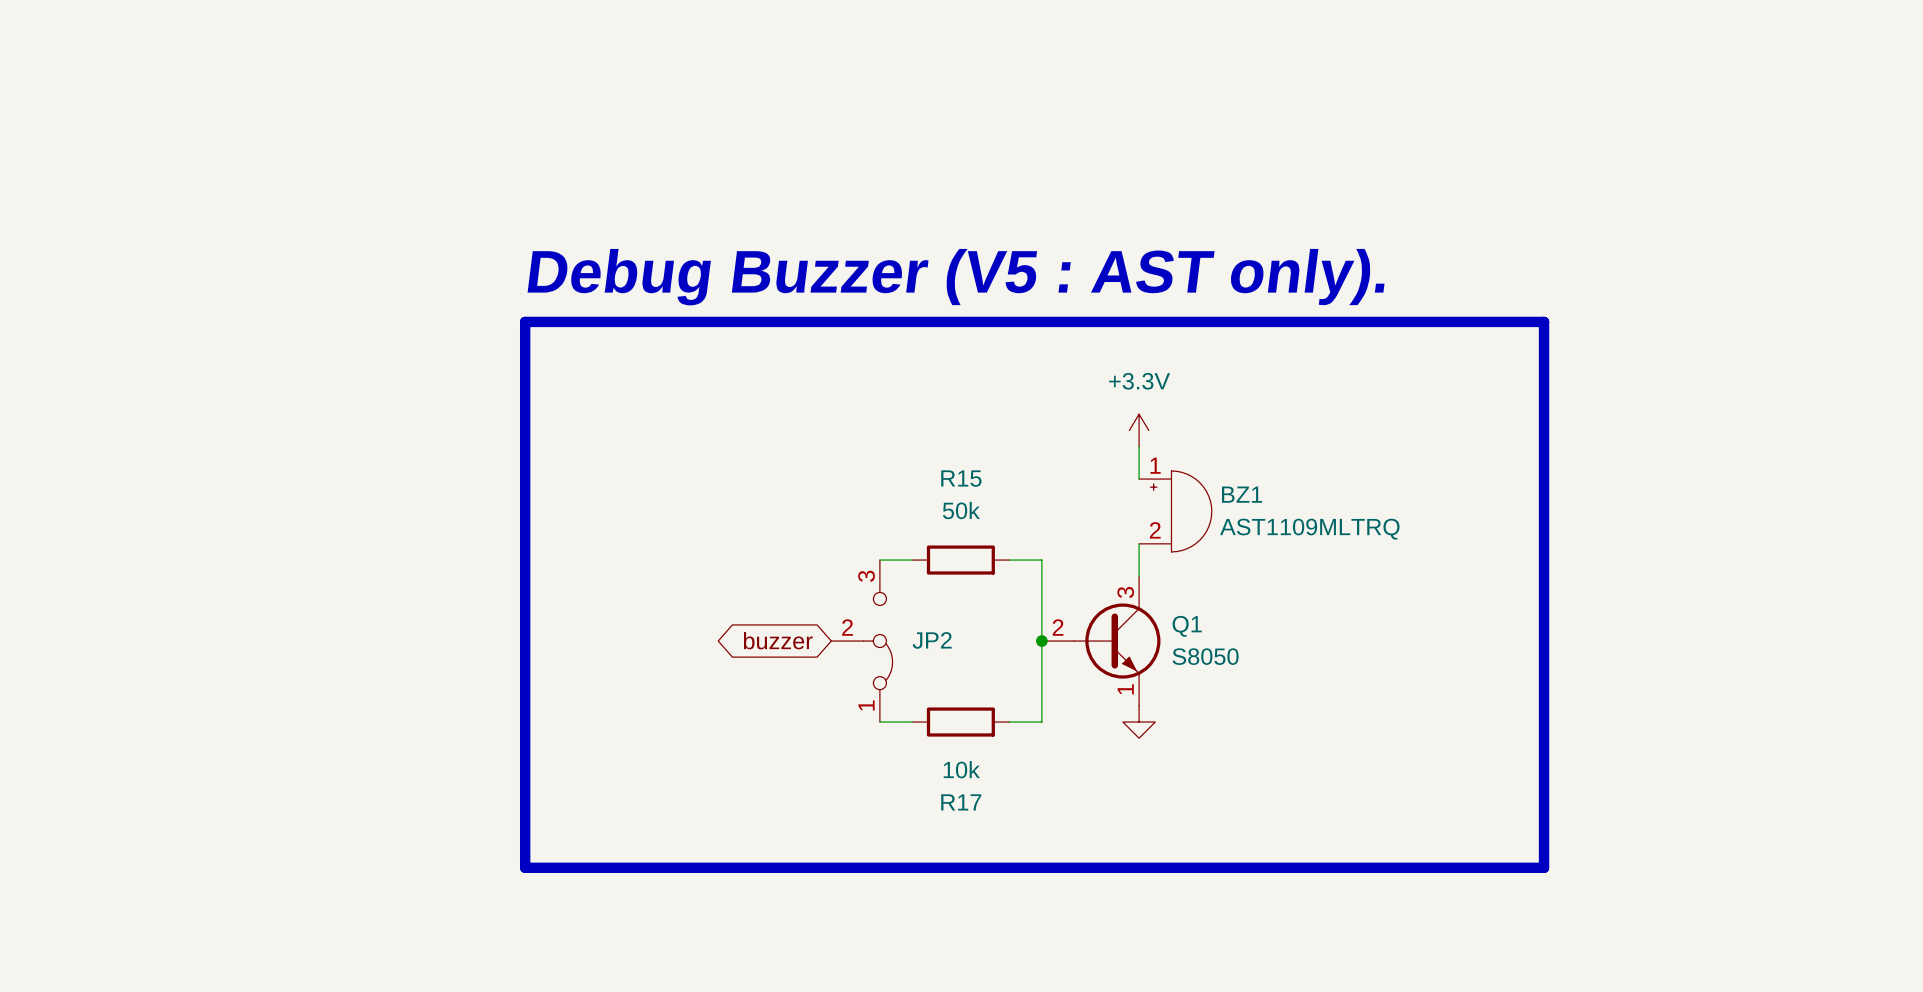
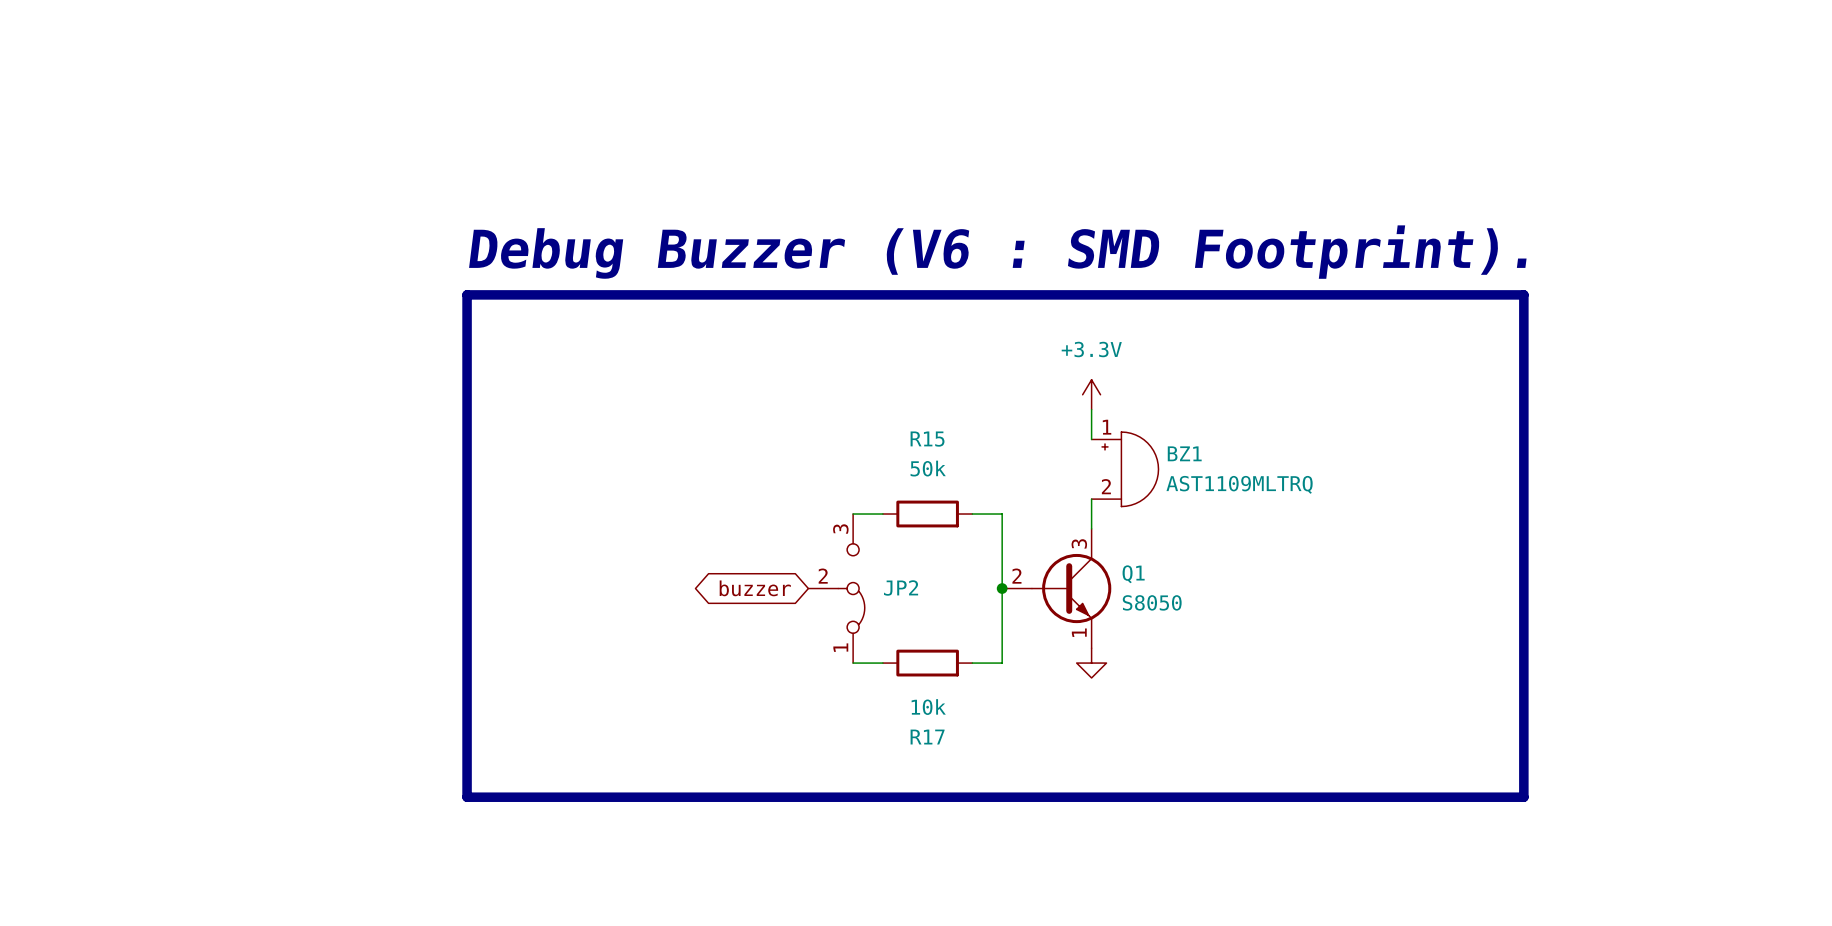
text: Debug Buzzer (V5 : AST only). (956, 277) -> Debug Buzzer (V6 : SMD Footprint). (997, 252)
line: (525, 321) (525, 867) -> (526, 294) (467, 294) (467, 797) (526, 797)
line: (1544, 321) (1544, 867) -> (1464, 294) (1523, 294) (1523, 797) (1464, 797)

